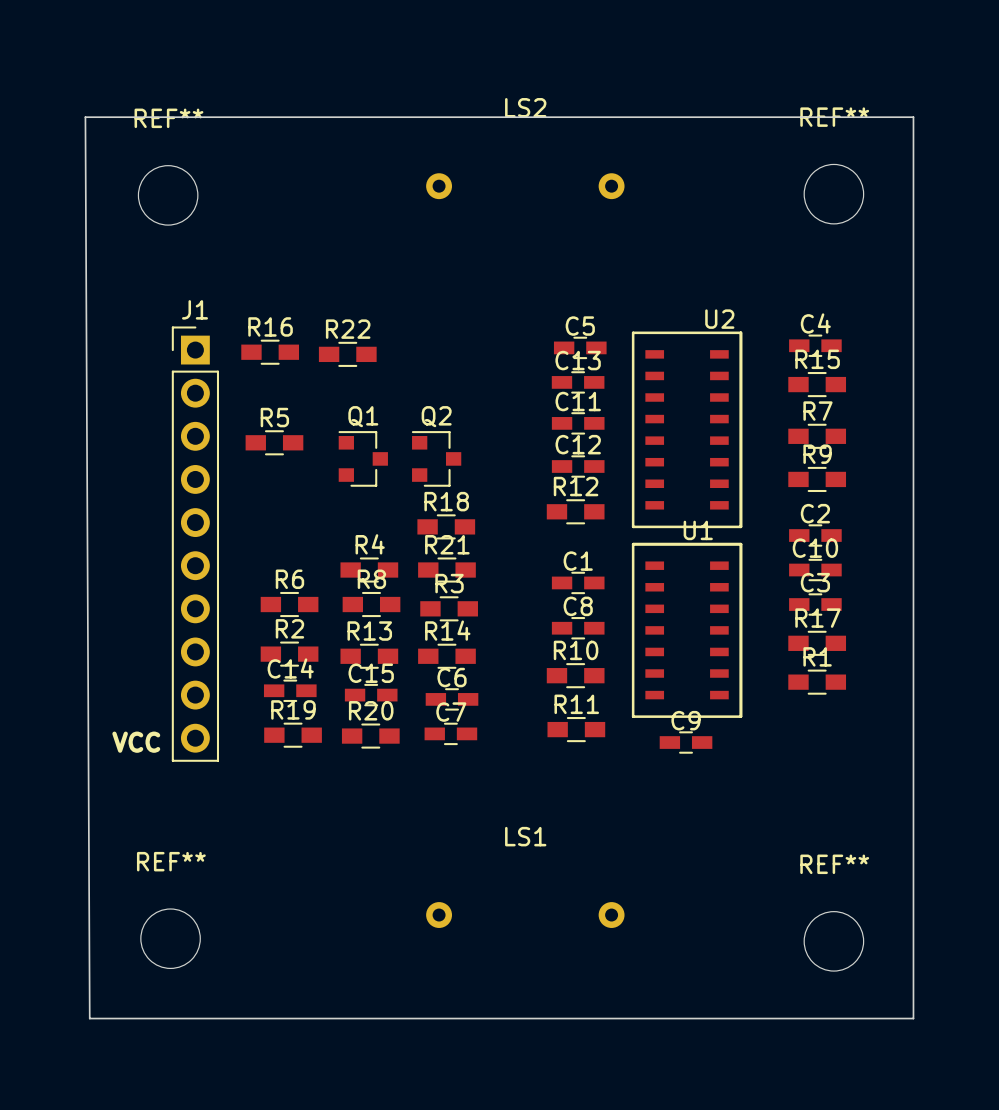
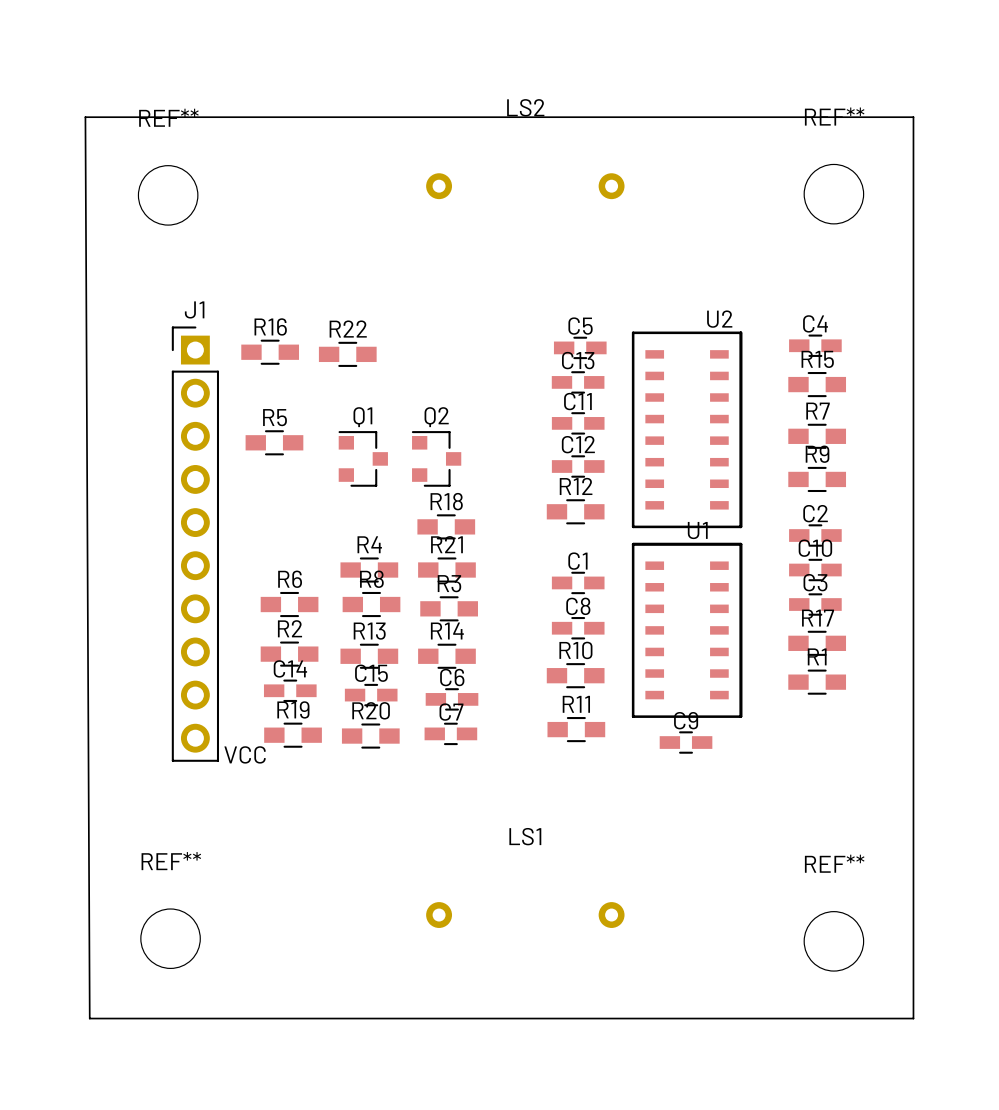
text position: VCC (136, 742) -> VCC (245, 754)

